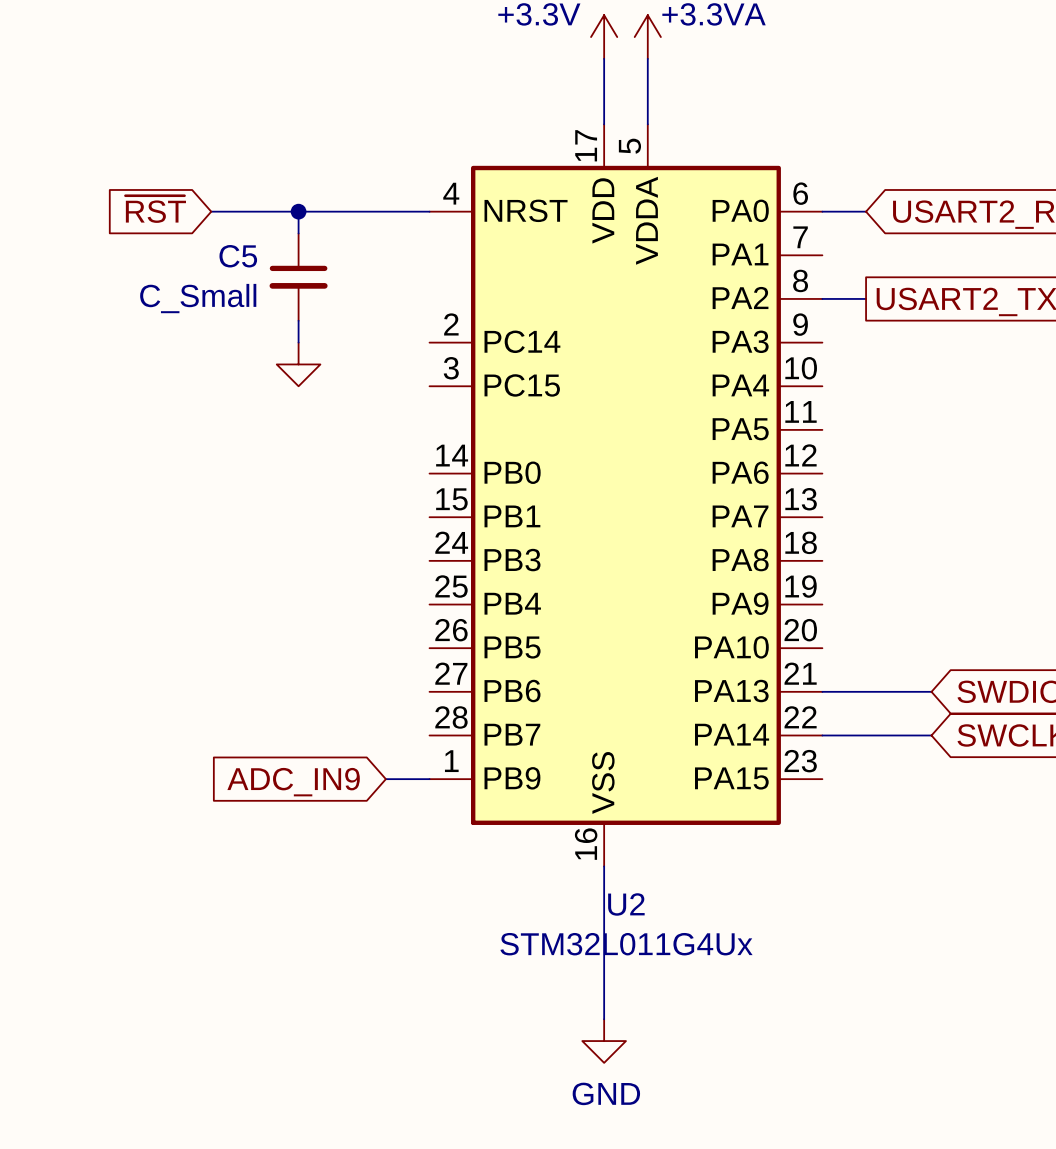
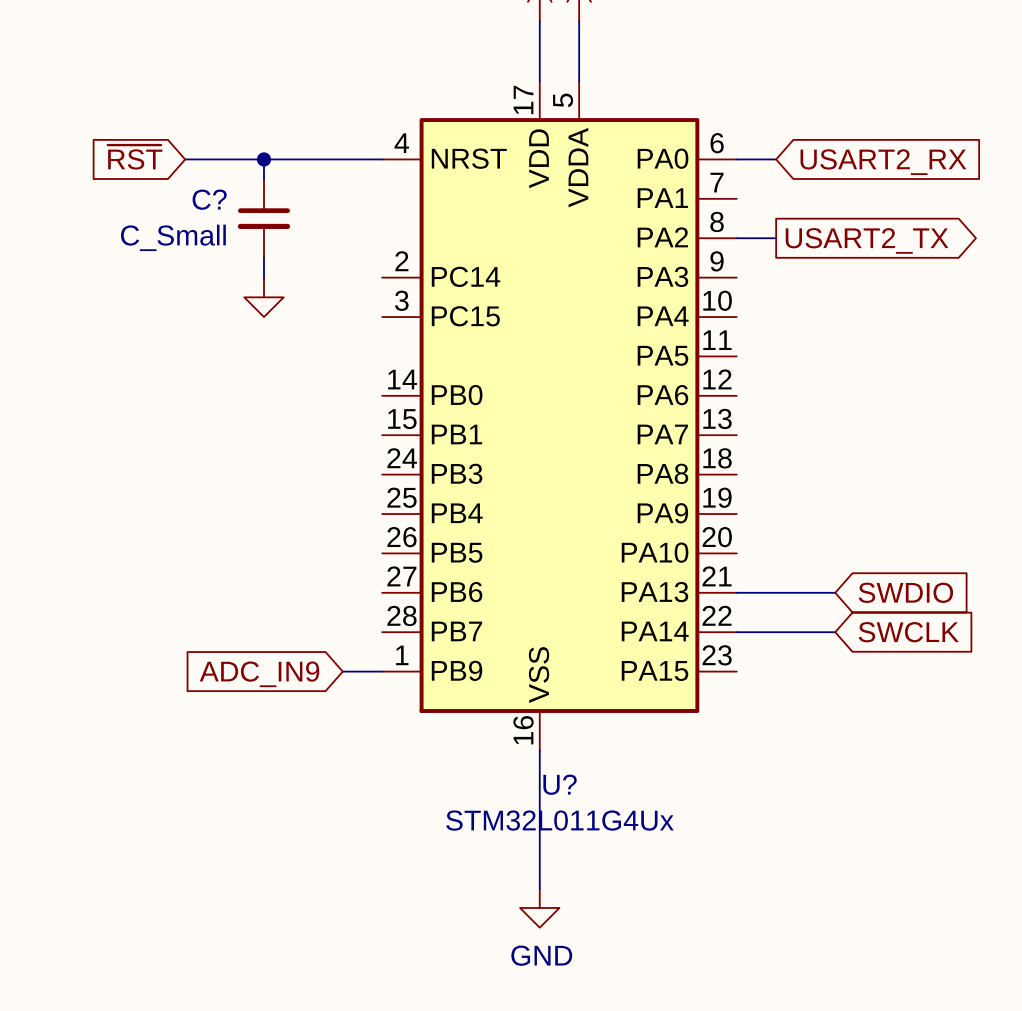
C5 name: C5 (238, 256) -> C? (209, 199)
U2 name: U2 (626, 904) -> U? (560, 784)

